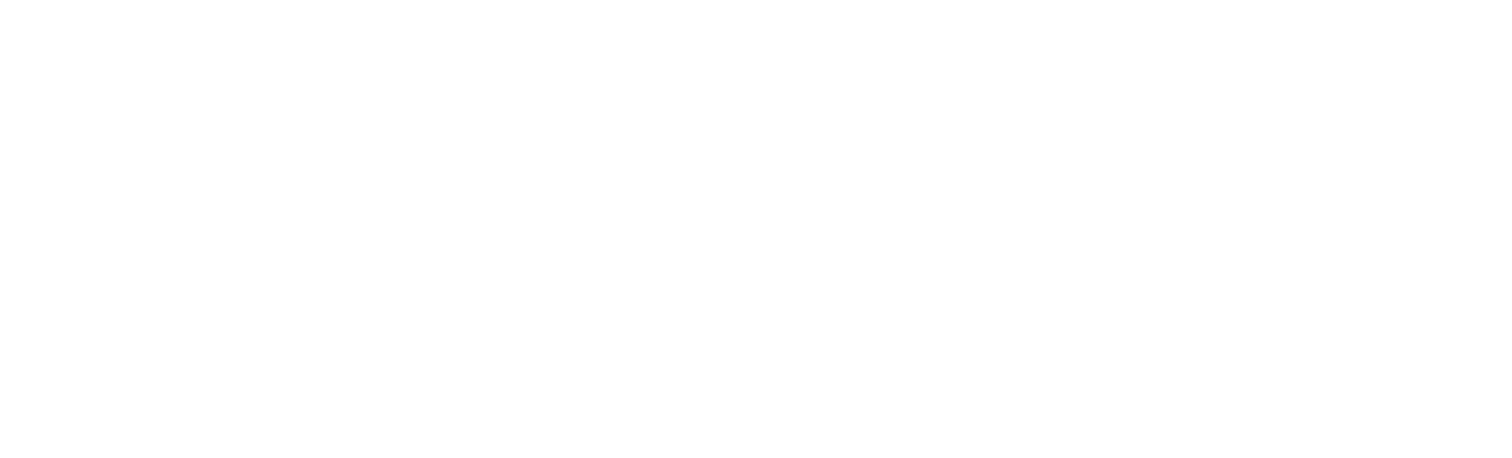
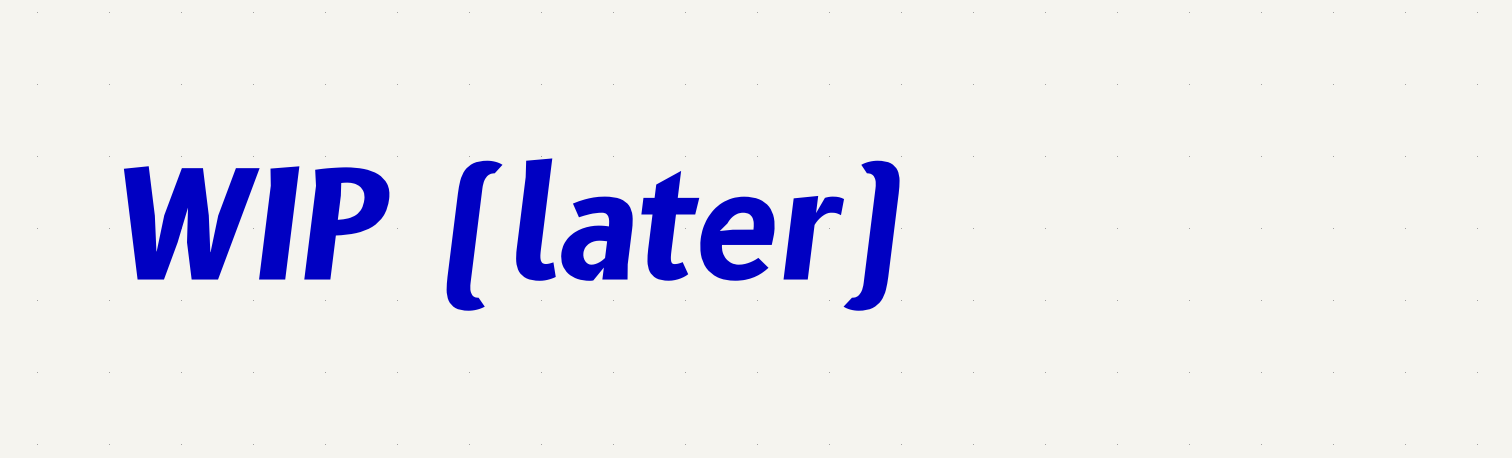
text: none -> WIP (later) (511, 234)

